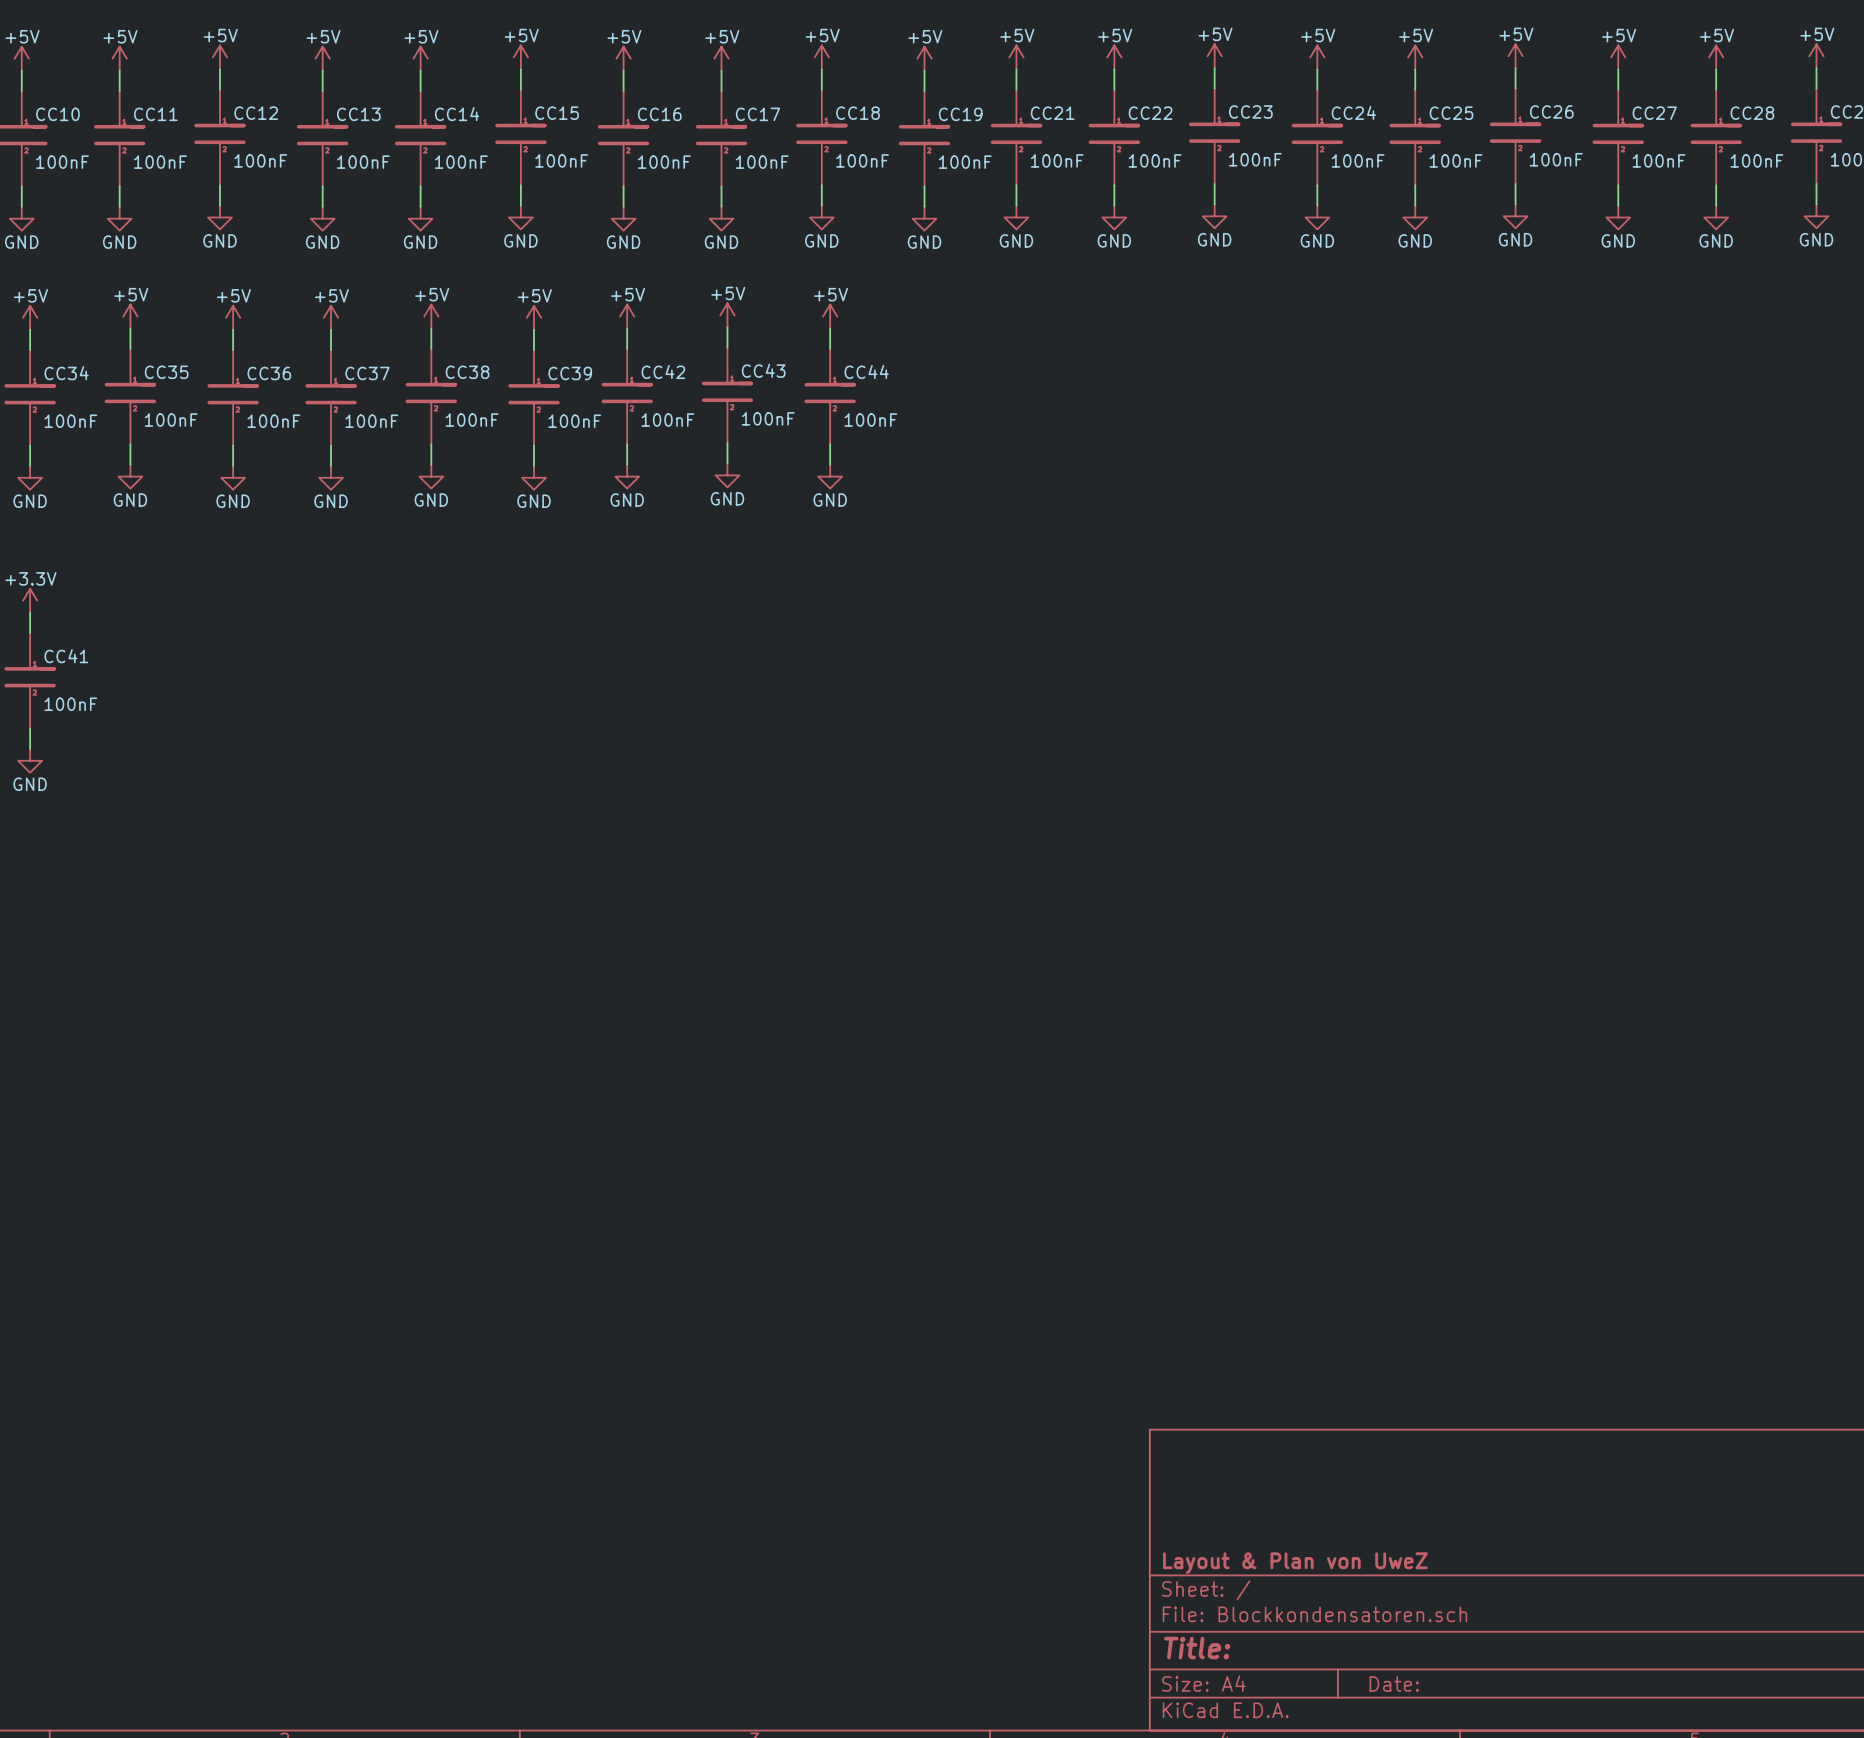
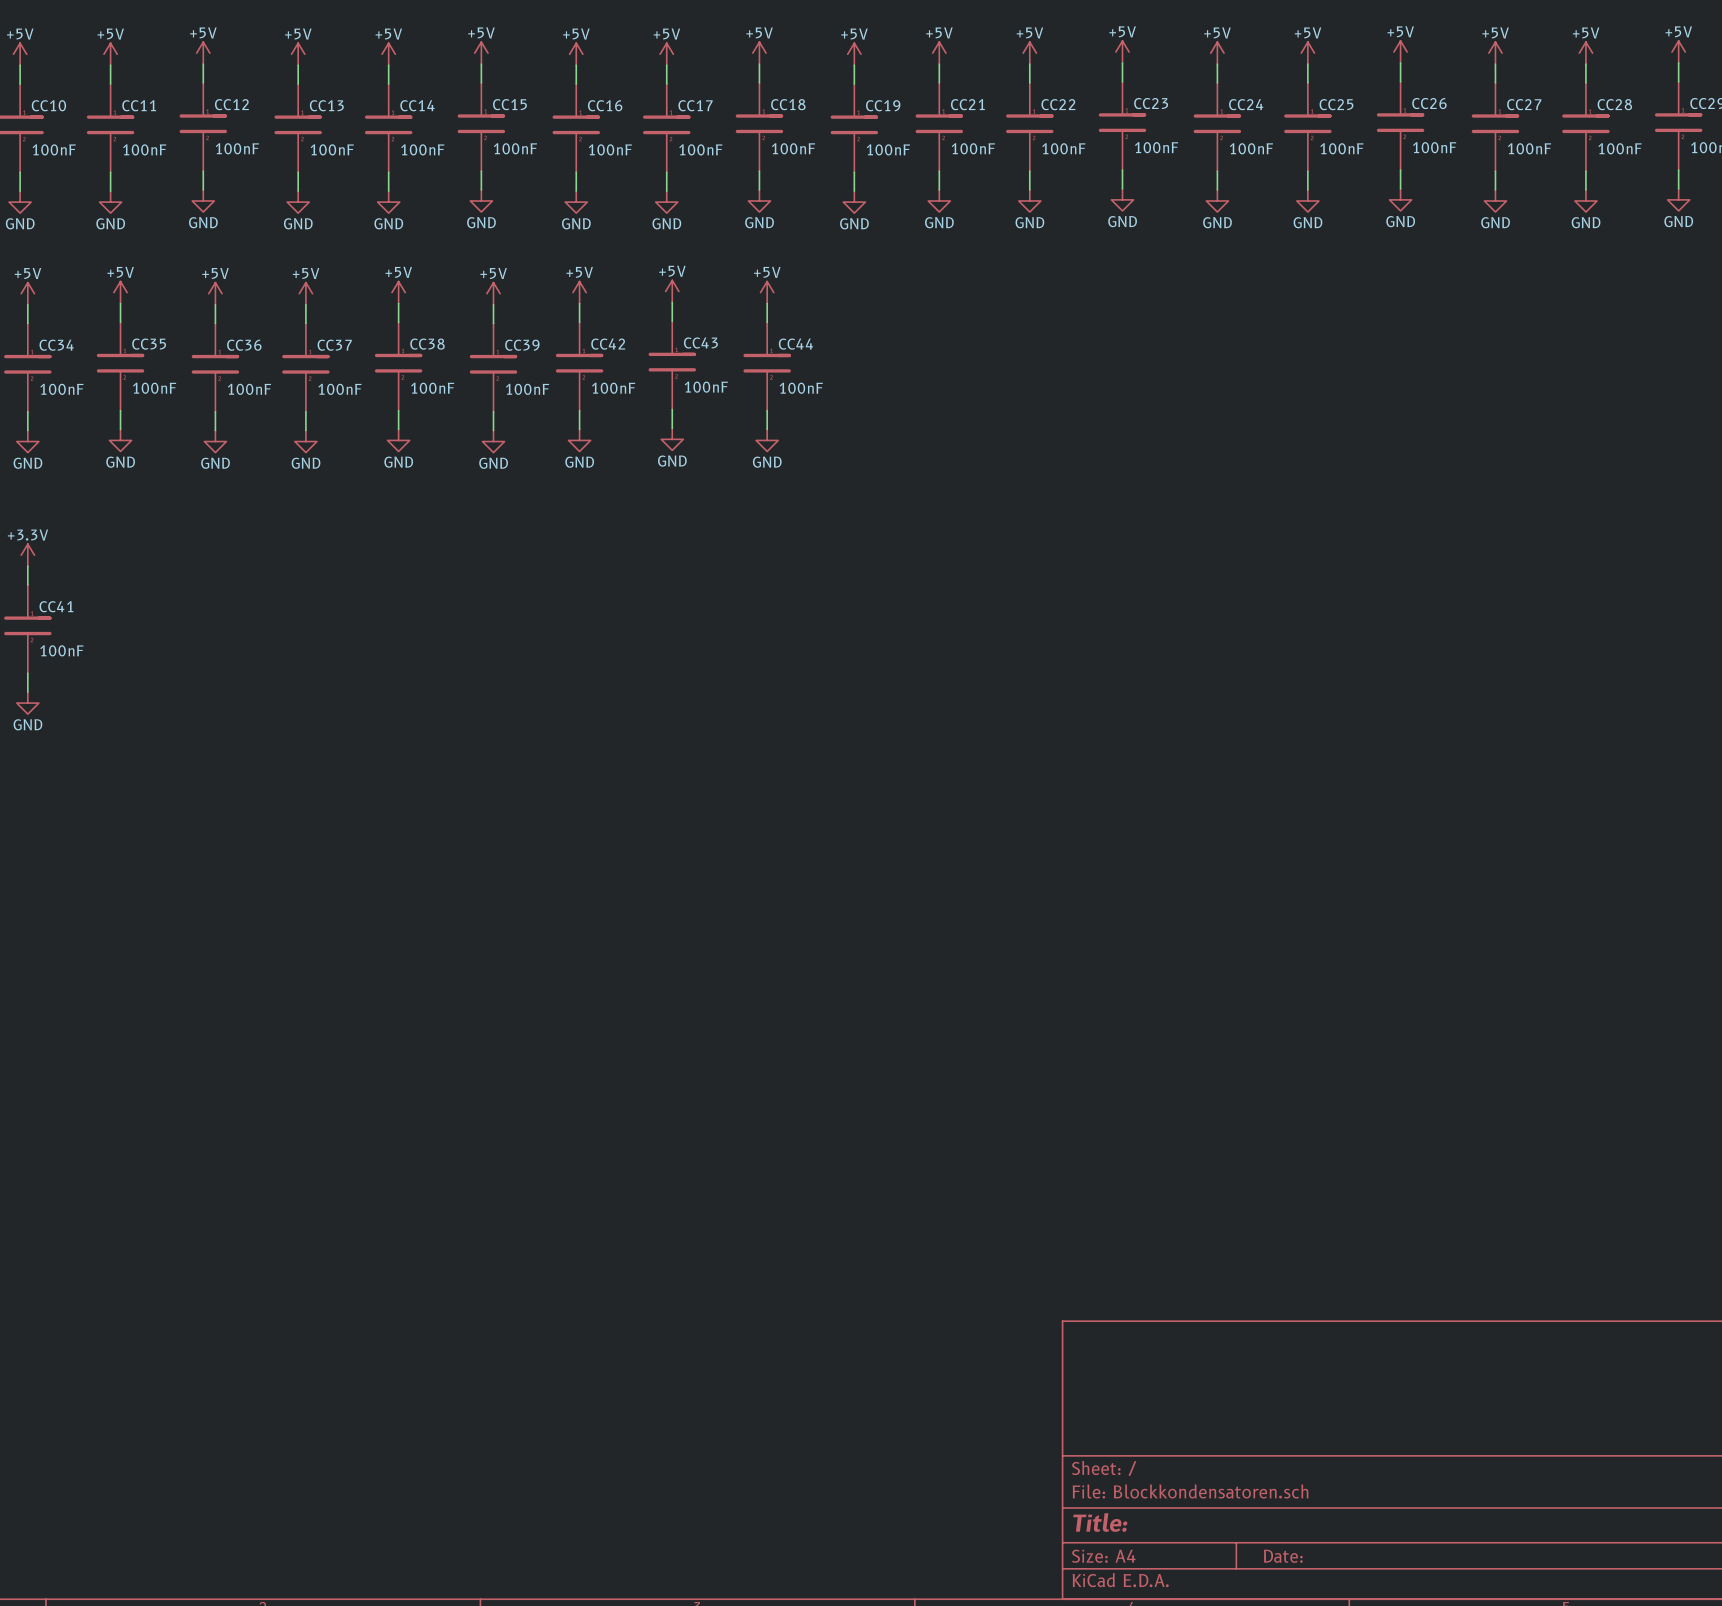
title block: Layout & Plan von UweZ (1295, 1563) -> none

